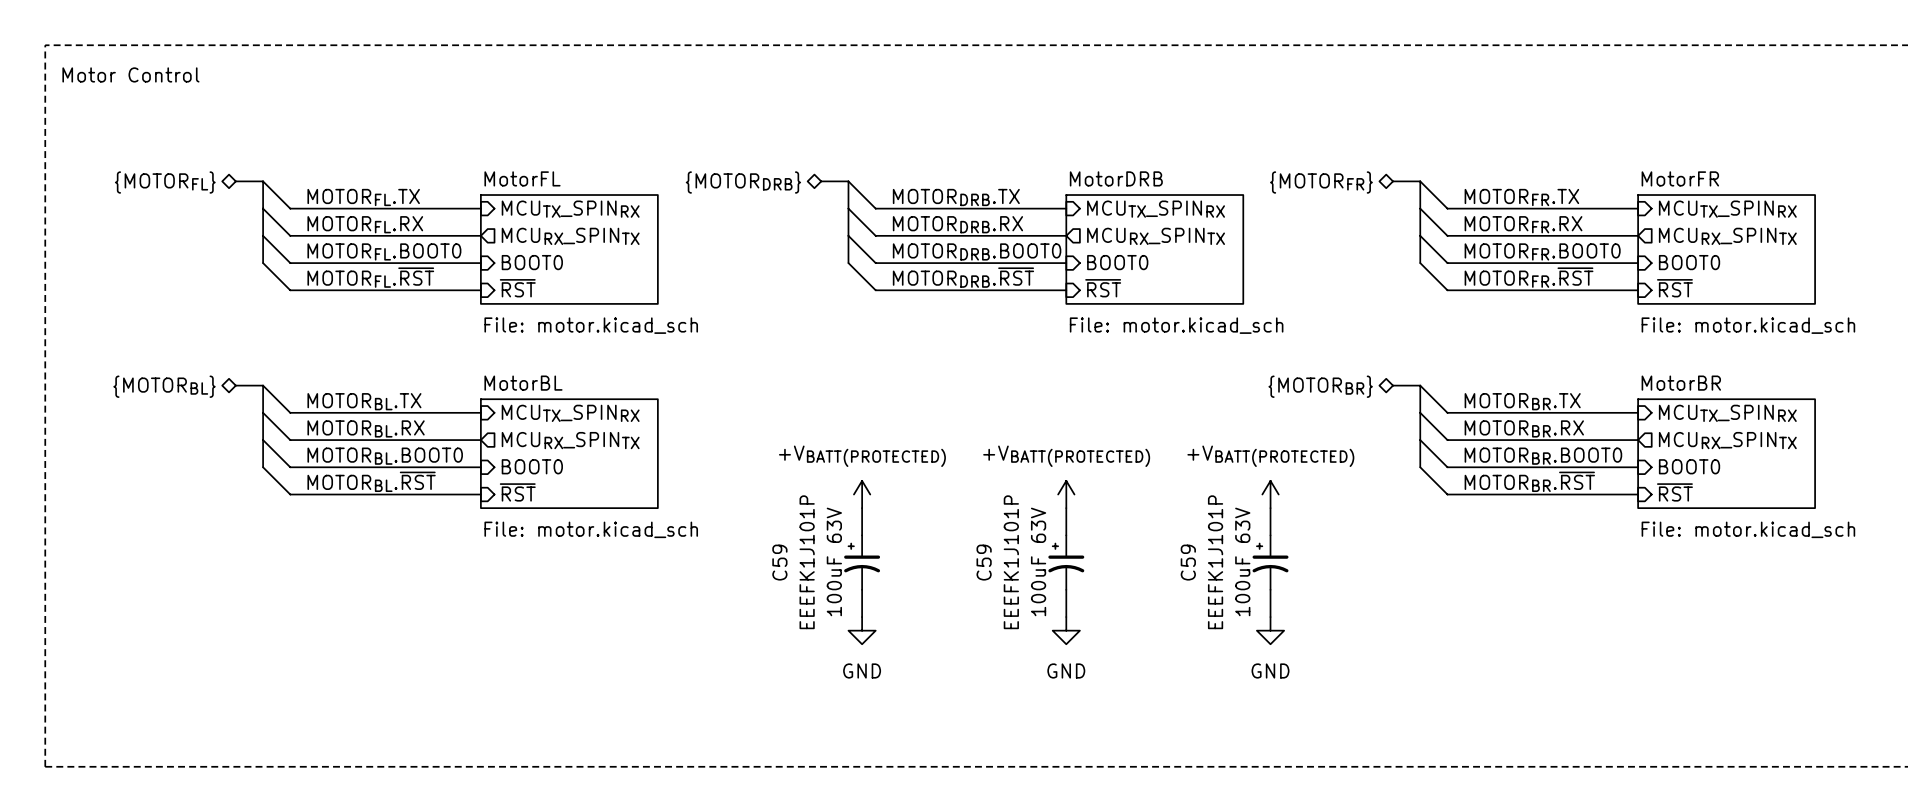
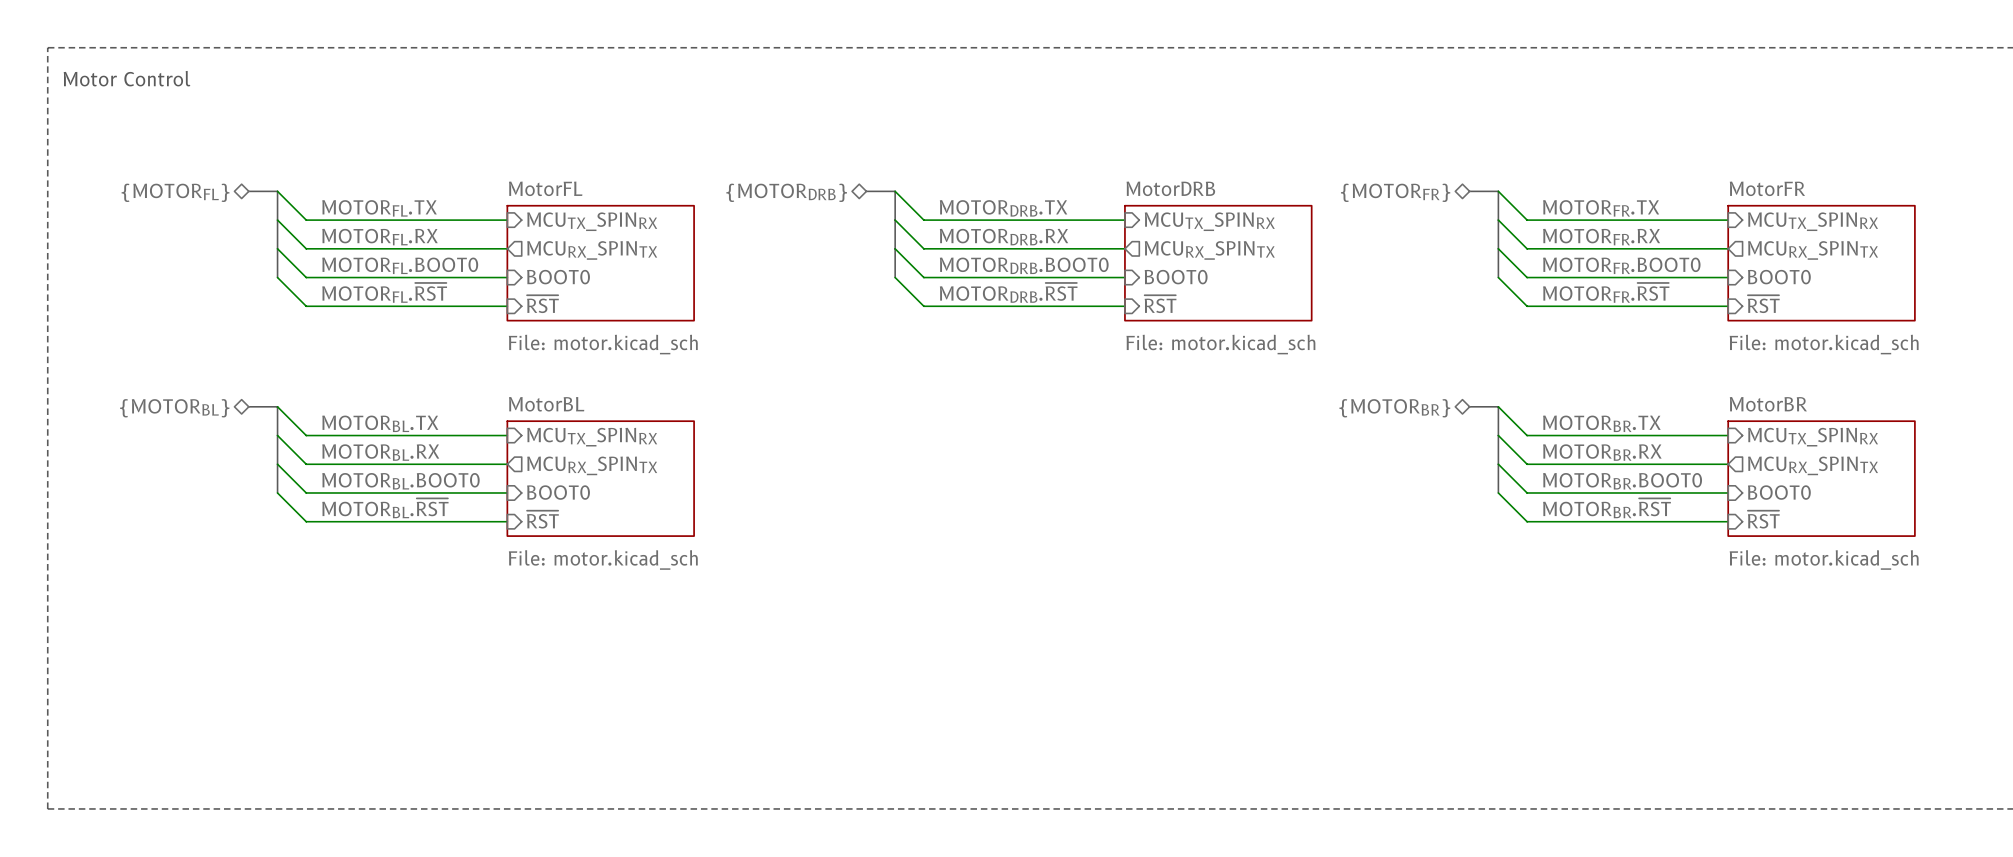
power symbol: +VBATT(PROTECTED) (862, 494) -> none
power symbol: +VBATT(PROTECTED) (1066, 494) -> none
power symbol: +VBATT(PROTECTED) (1270, 494) -> none
wire: (862, 508) (862, 535) -> none
wire: (1066, 508) (1066, 535) -> none
wire: (1270, 508) (1270, 535) -> none
C59: EEEFK1J101P (862, 562) -> none
C59: EEEFK1J101P (1066, 562) -> none
C59: EEEFK1J101P (1270, 562) -> none
wire: (862, 589) (862, 617) -> none
wire: (1066, 589) (1066, 617) -> none
wire: (1270, 589) (1270, 617) -> none
power symbol: GND (862, 630) -> none
power symbol: GND (1066, 630) -> none
power symbol: GND (1270, 630) -> none

